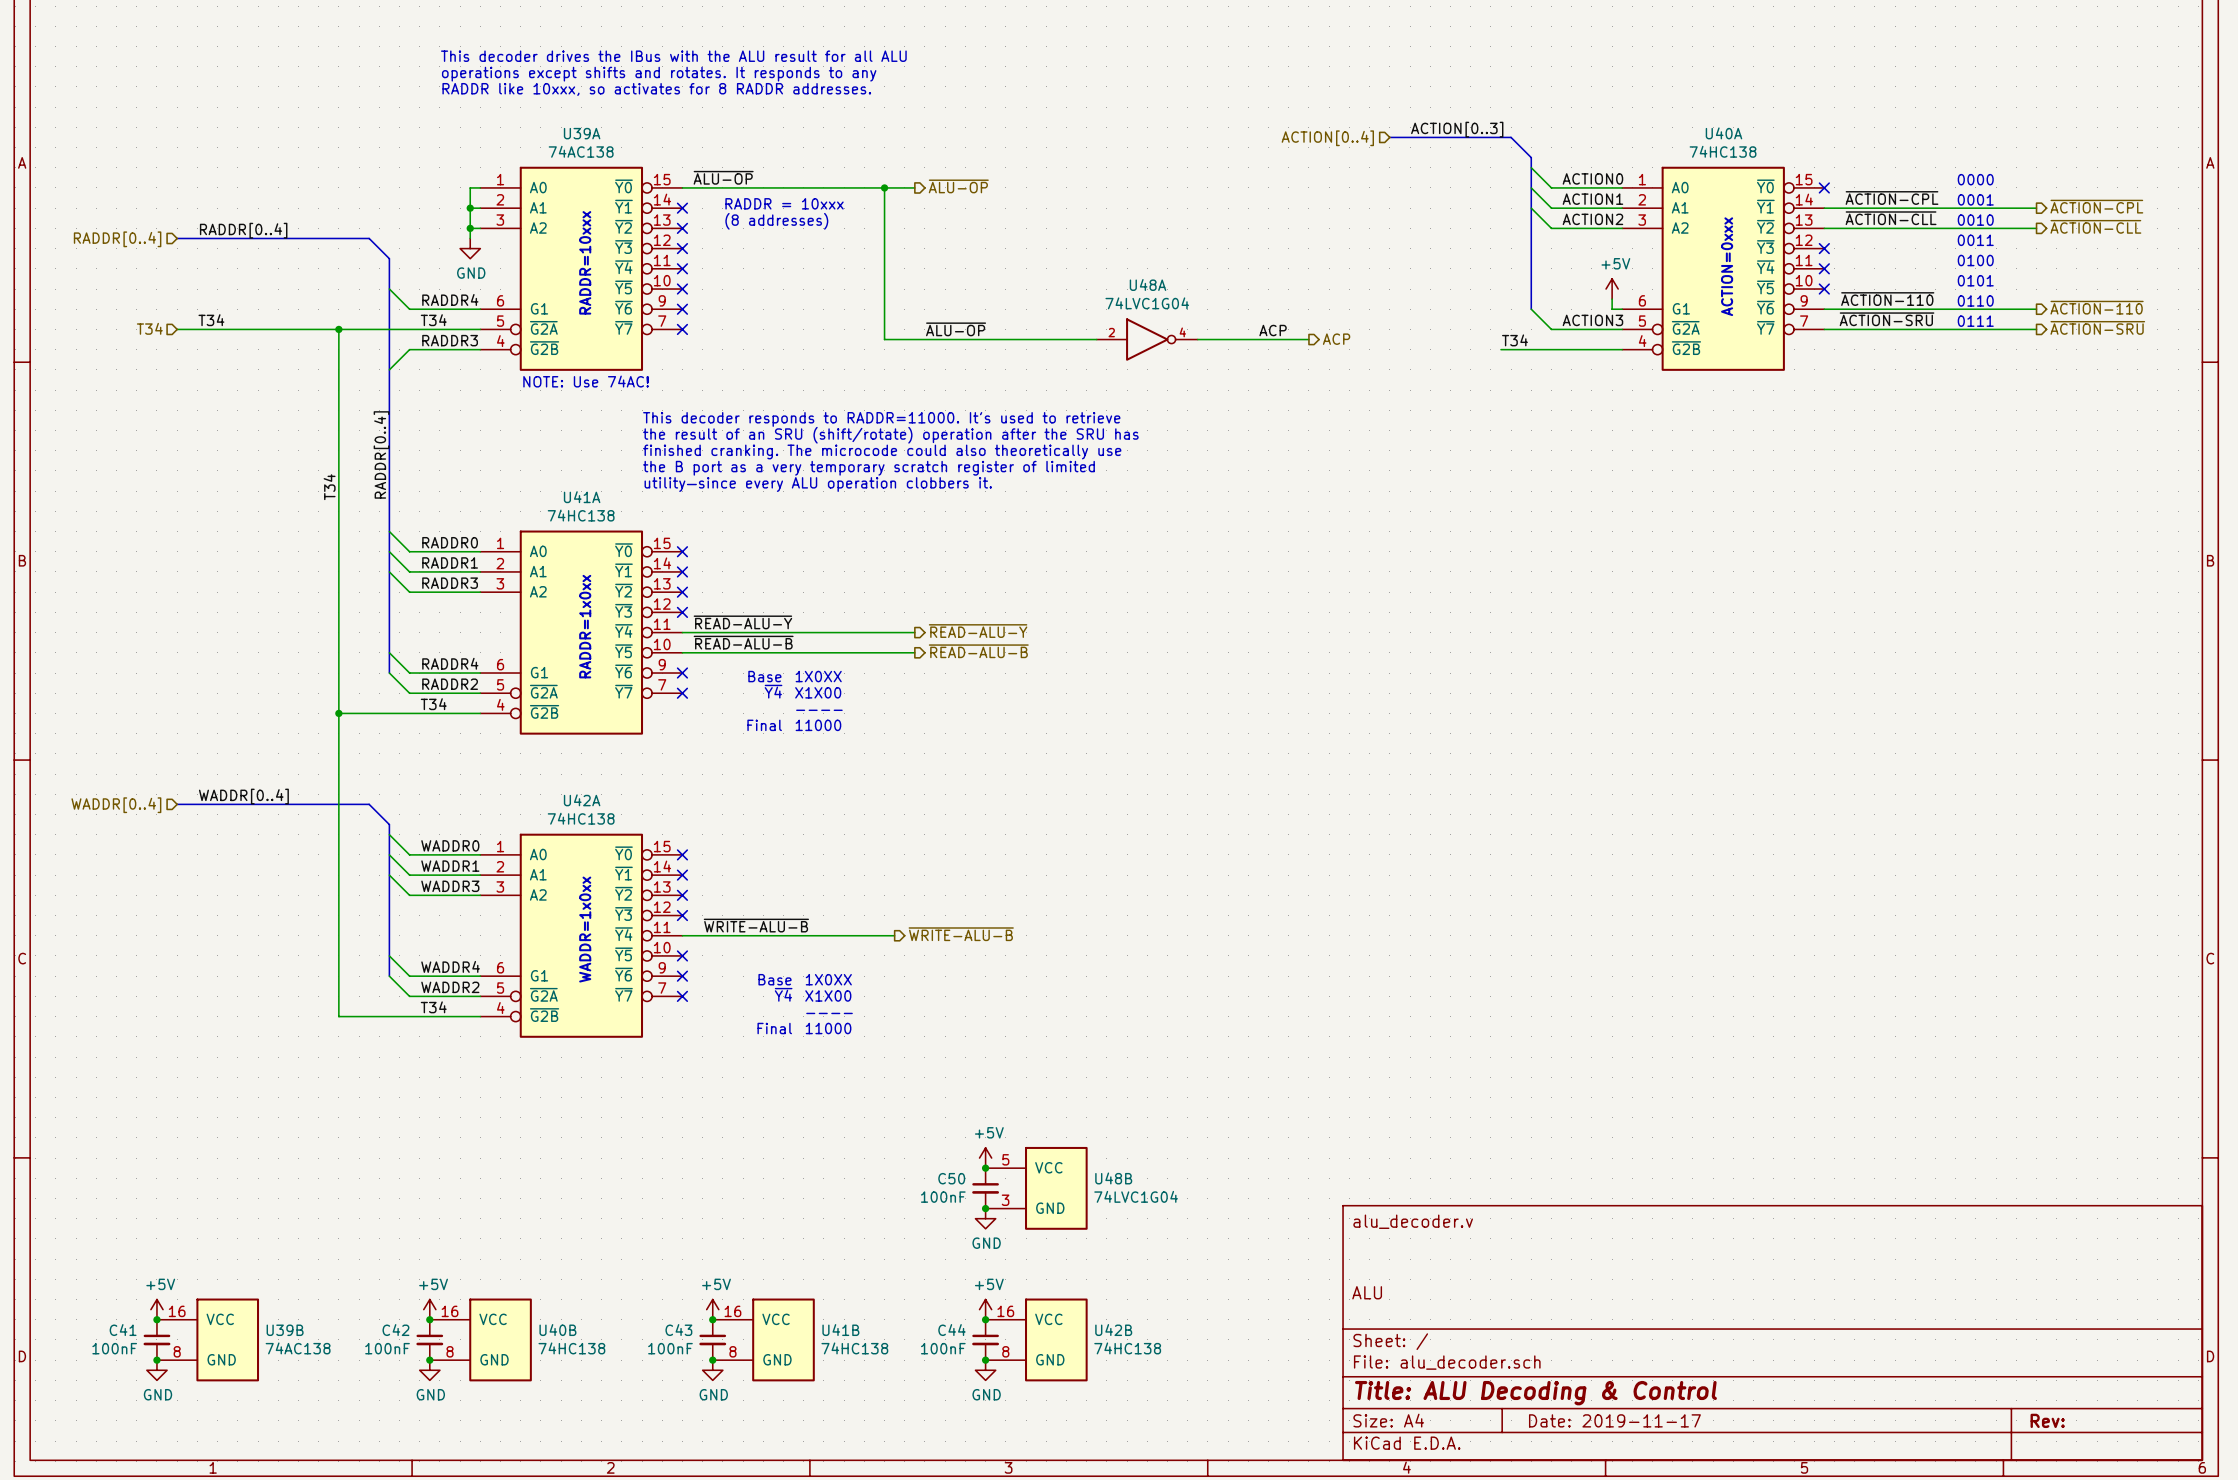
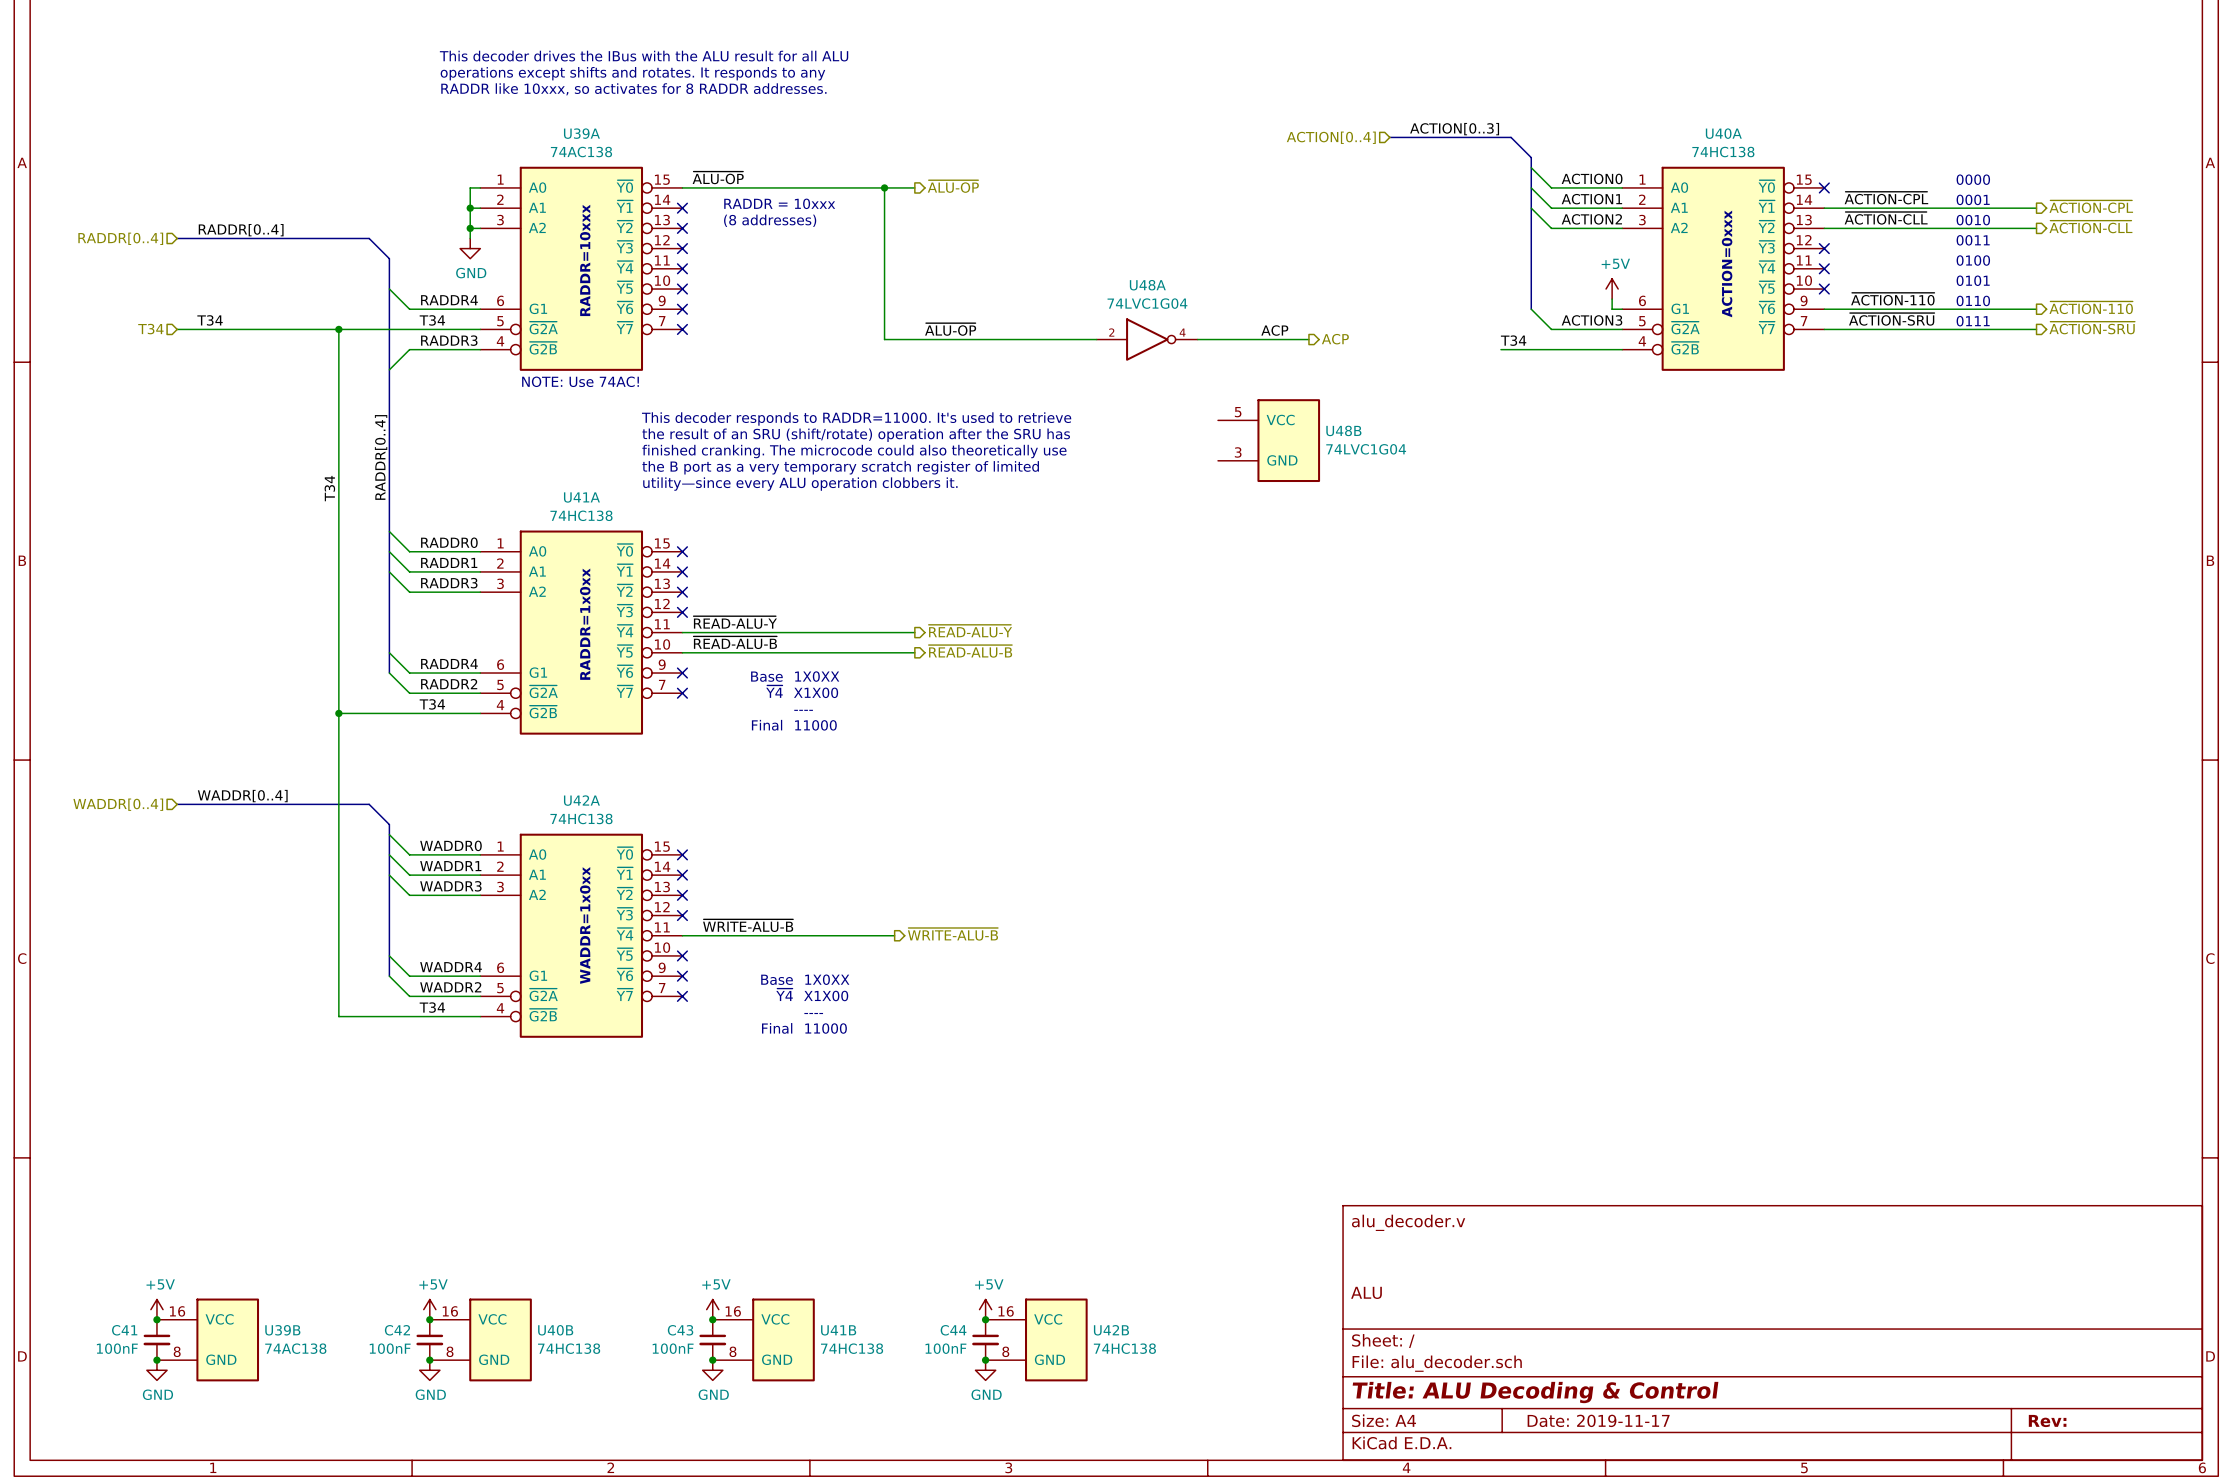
power symbol: +5V (985, 1158) -> none
junction: (985, 1168) -> none
C50: 100nF (985, 1188) -> none
U48B position: (1036, 1188) -> (1269, 440)
junction: (985, 1208) -> none
power symbol: GND (985, 1218) -> none

